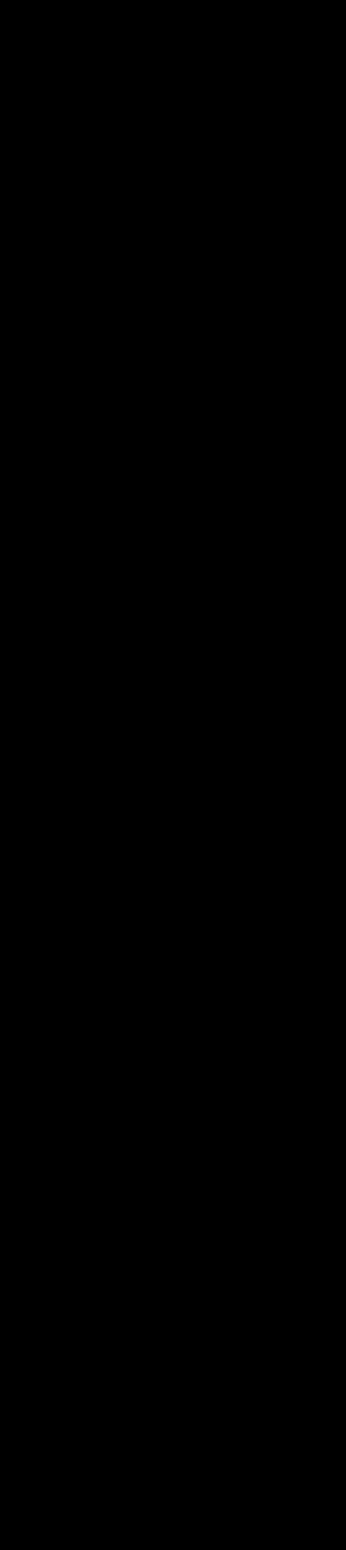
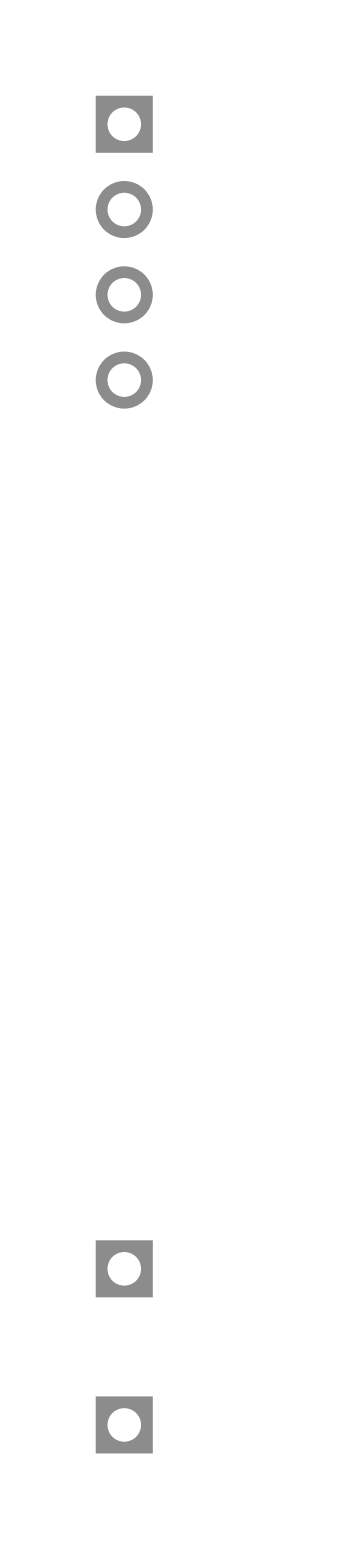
part: none -> (124, 252)
part: none -> (124, 1268)
part: none -> (124, 1424)

